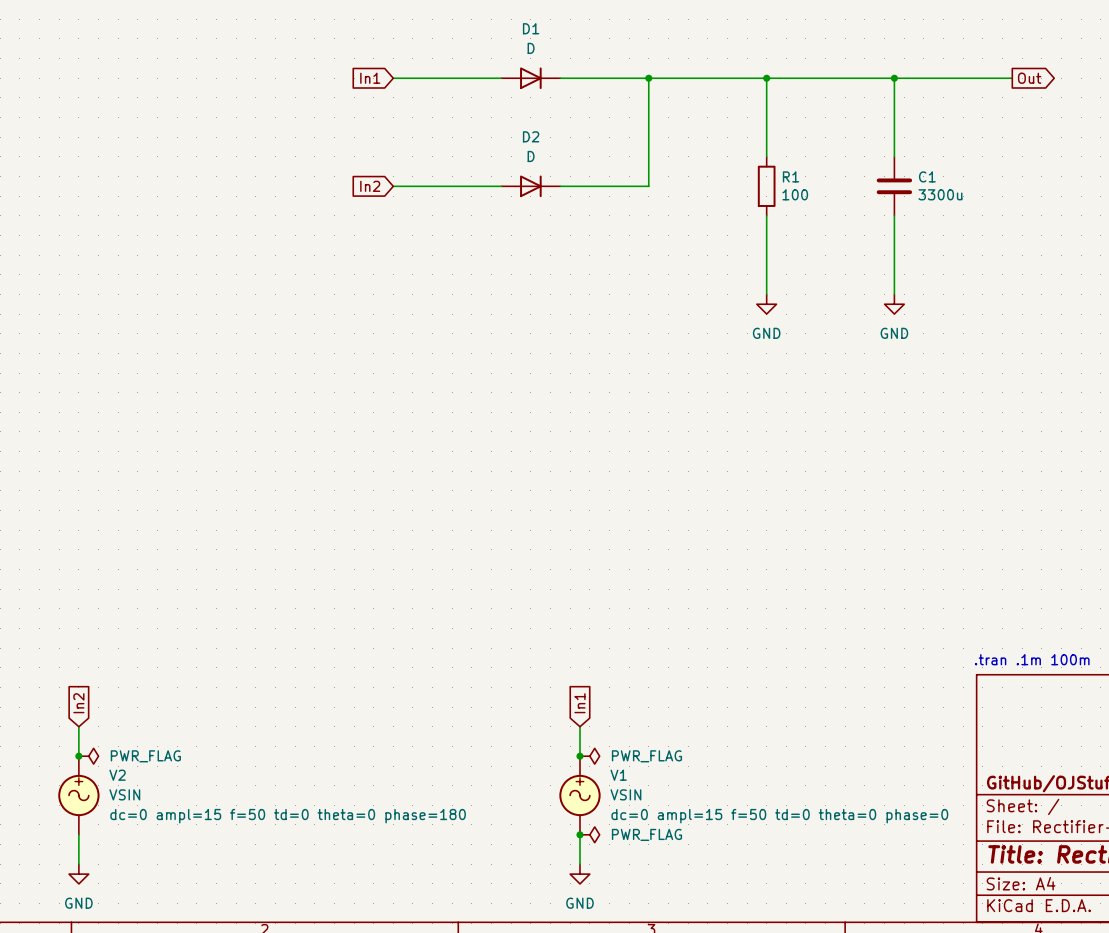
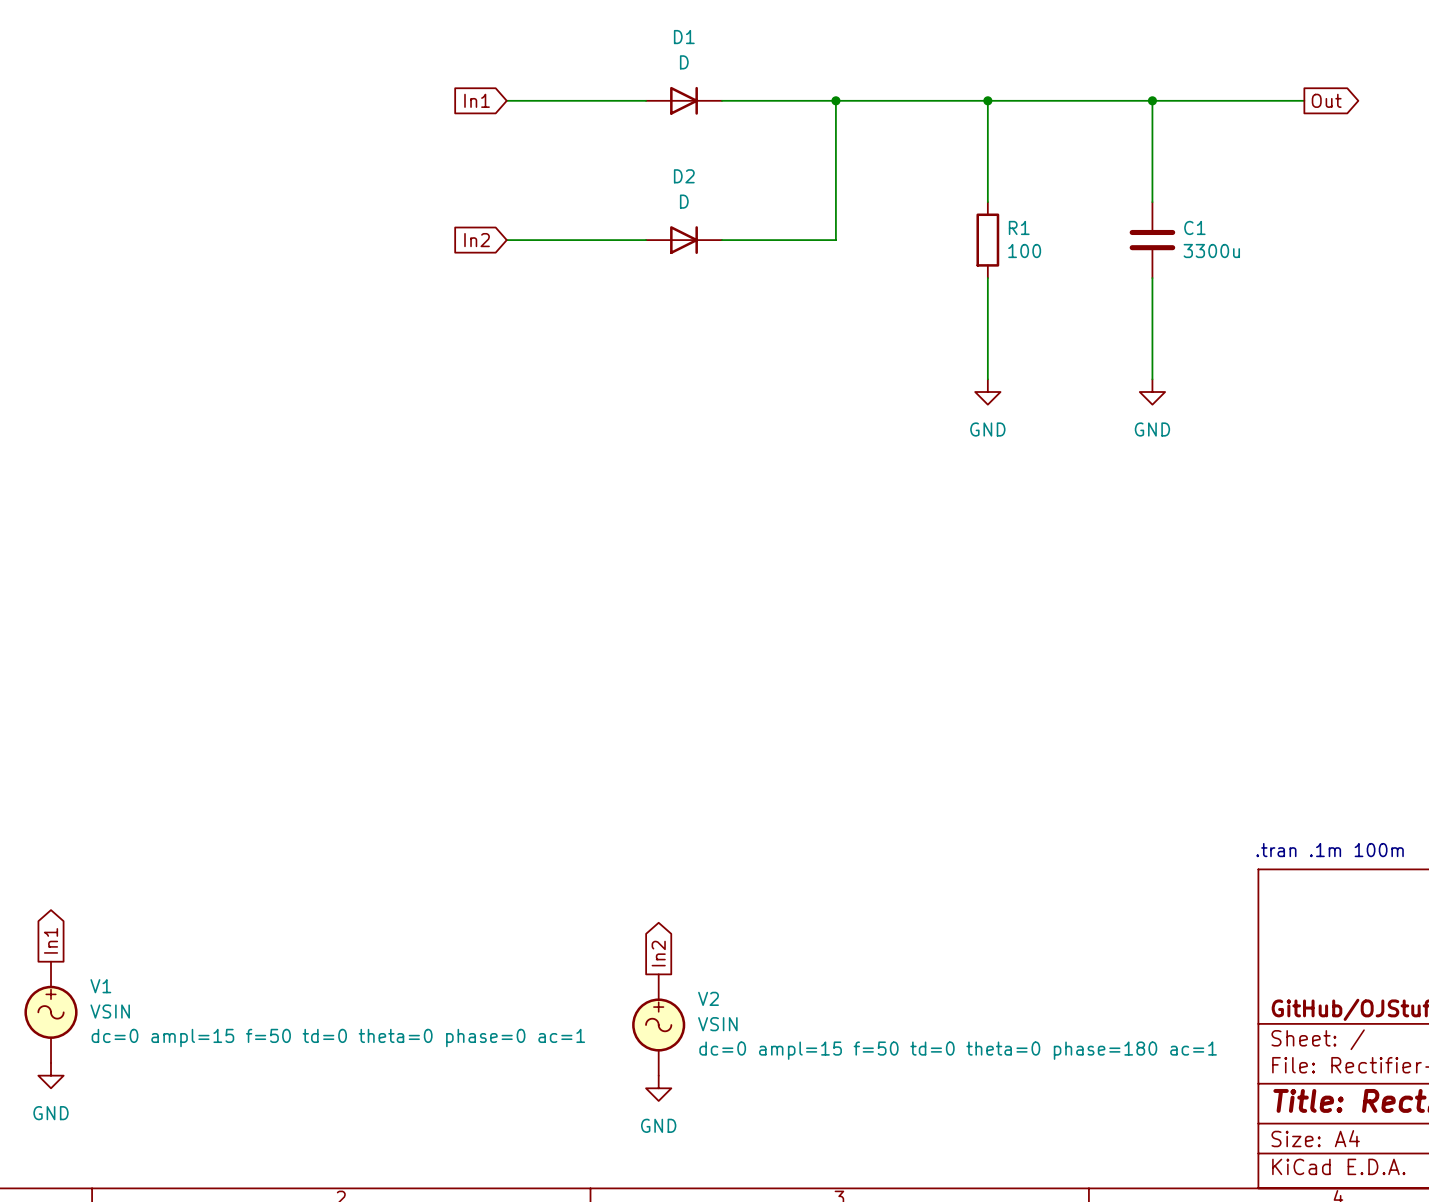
global label: In2 (78, 703) -> none
global label: In1 (579, 703) -> none
wire: (78, 726) (78, 756) -> none
wire: (579, 726) (579, 756) -> none
global label: none -> In1 (51, 940)
global label: none -> In2 (658, 953)
junction: (78, 756) -> none
power symbol: PWR_FLAG (88, 756) -> none
junction: (579, 756) -> none
power symbol: PWR_FLAG (589, 756) -> none
V2 position: (78, 795) -> (658, 1025)
V1 position: (579, 795) -> (51, 1012)
V2 text: dc=0 ampl=15 f=50 td=0 theta=0 phase=180 (288, 816) -> dc=0 ampl=15 f=50 td=0 theta=0 phase=180 ac=1 (958, 1050)
V1 text: dc=0 ampl=15 f=50 td=0 theta=0 phase=0 (779, 816) -> dc=0 ampl=15 f=50 td=0 theta=0 phase=0 ac=1 (338, 1038)
wire: (78, 834) (78, 864) -> none
wire: (579, 834) (579, 864) -> none
junction: (579, 834) -> none
power symbol: PWR_FLAG (589, 834) -> none
power symbol position: GND (78, 874) -> GND (51, 1075)
power symbol position: GND (579, 874) -> GND (658, 1088)

